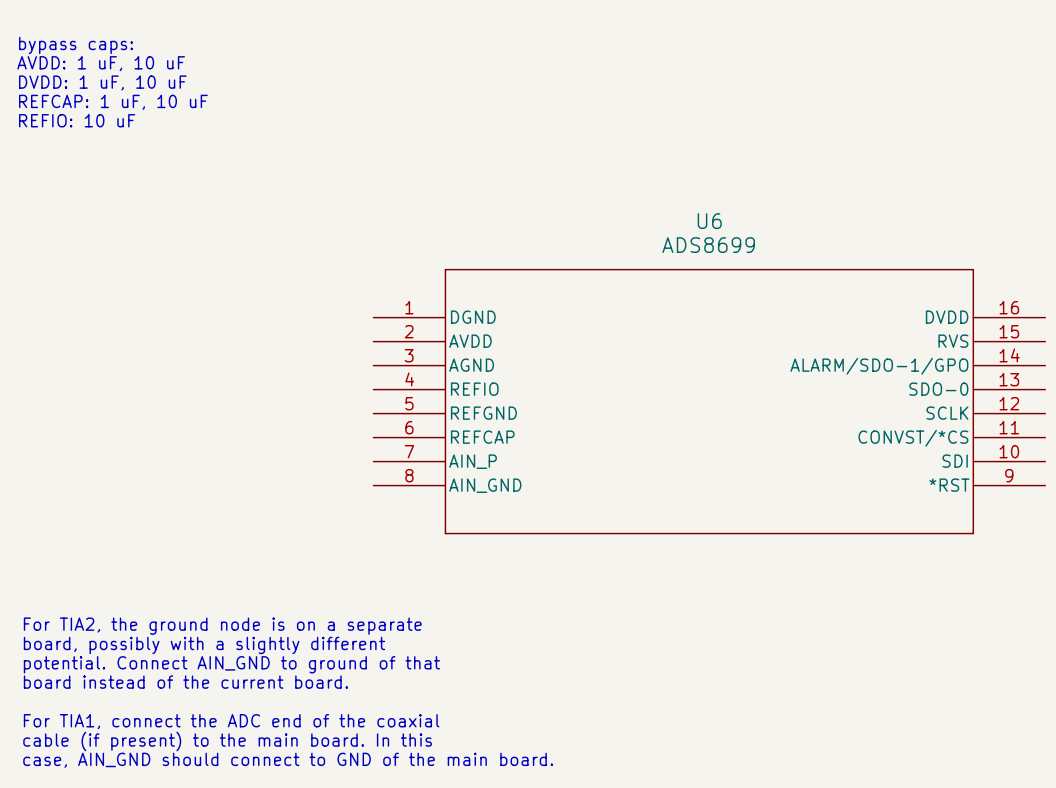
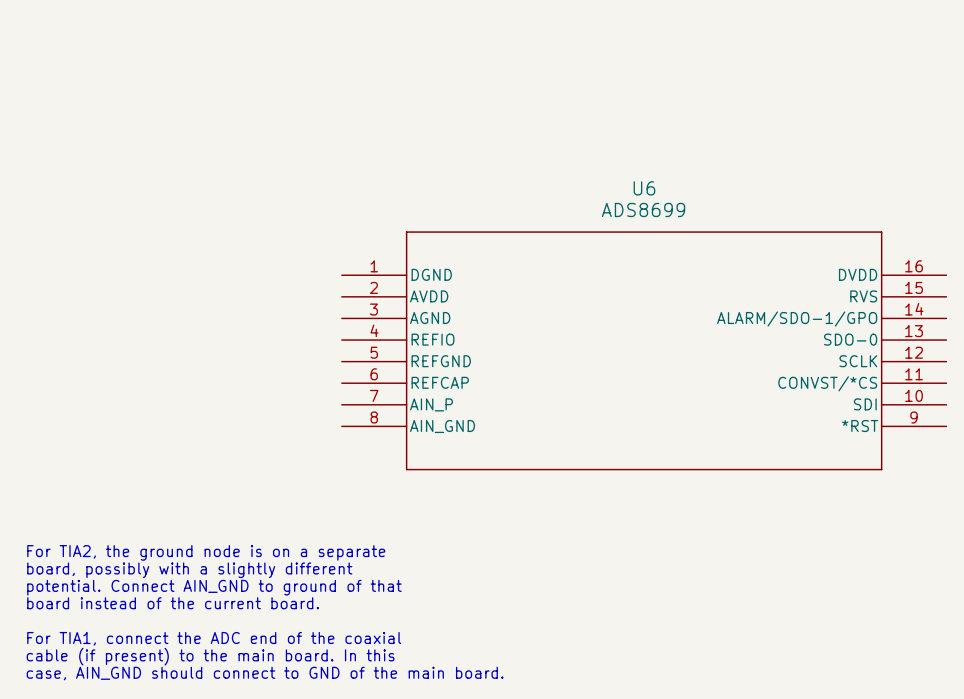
text: bypass caps: (76, 45) -> none
text: AVDD: 1 uF, 10 uF (101, 63) -> none
text: DVDD: 1 uF, 10 uF (102, 82) -> none
text: REFCAP: 1 uF, 10 uF (113, 102) -> none
text: REFIO: 10 uF (77, 120) -> none

